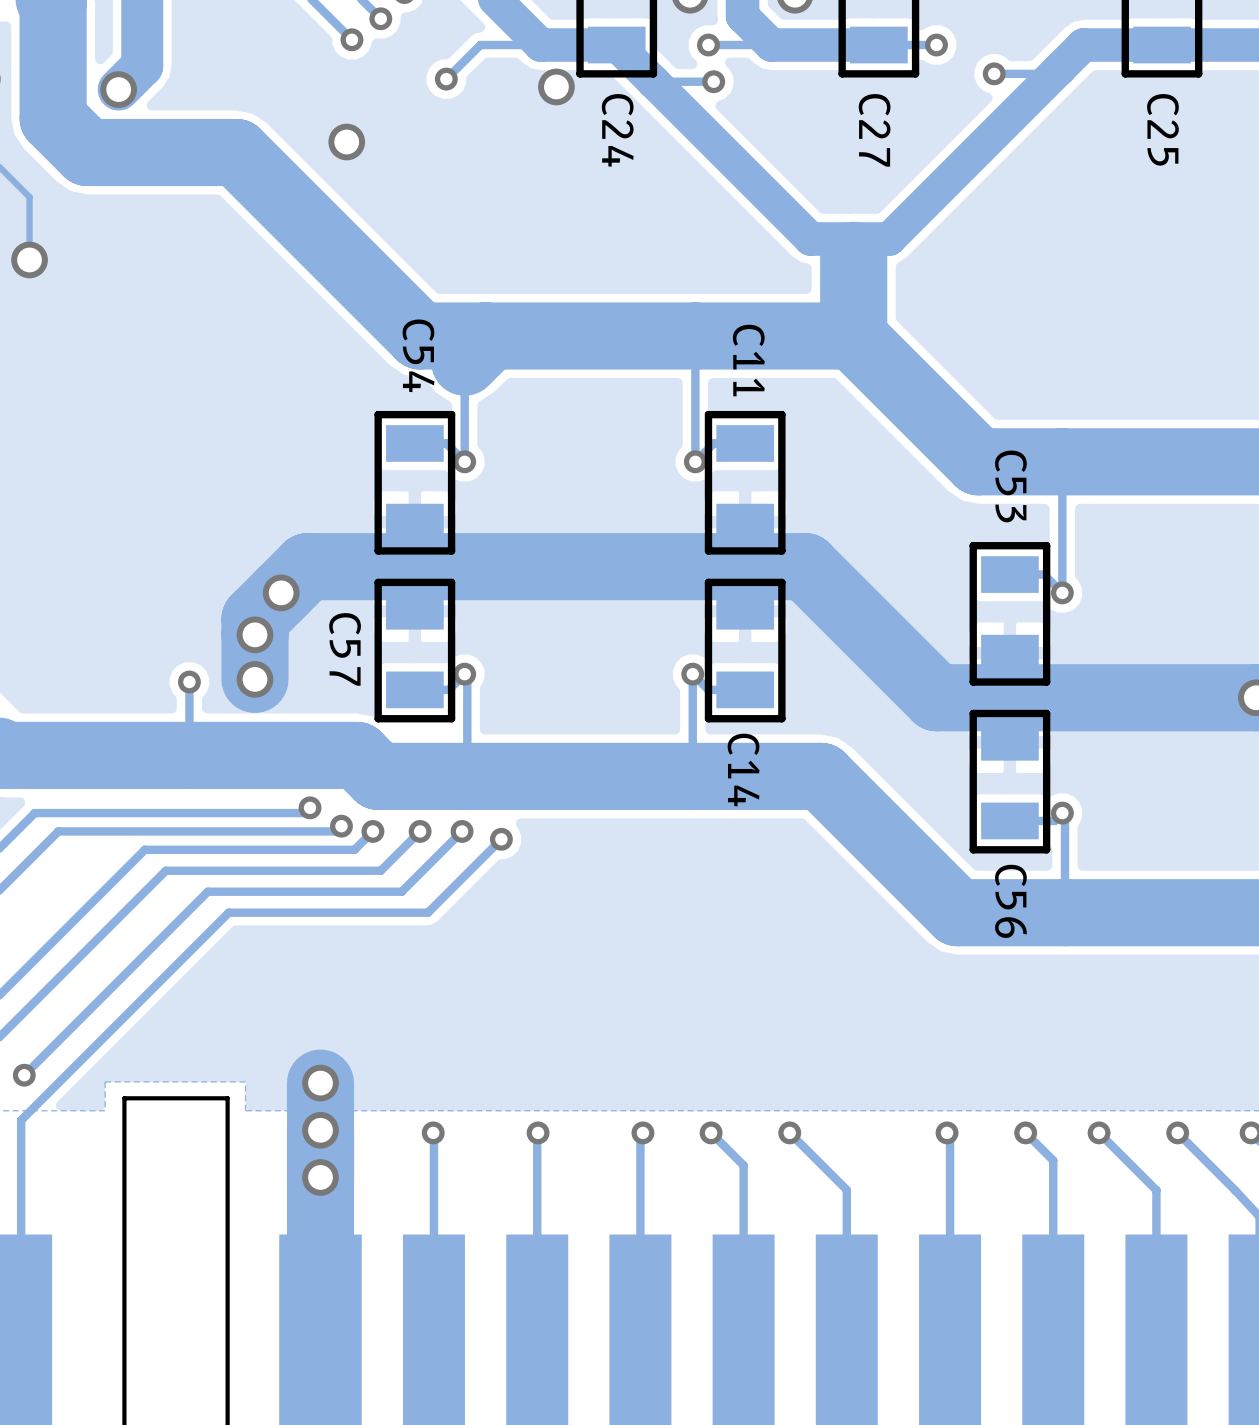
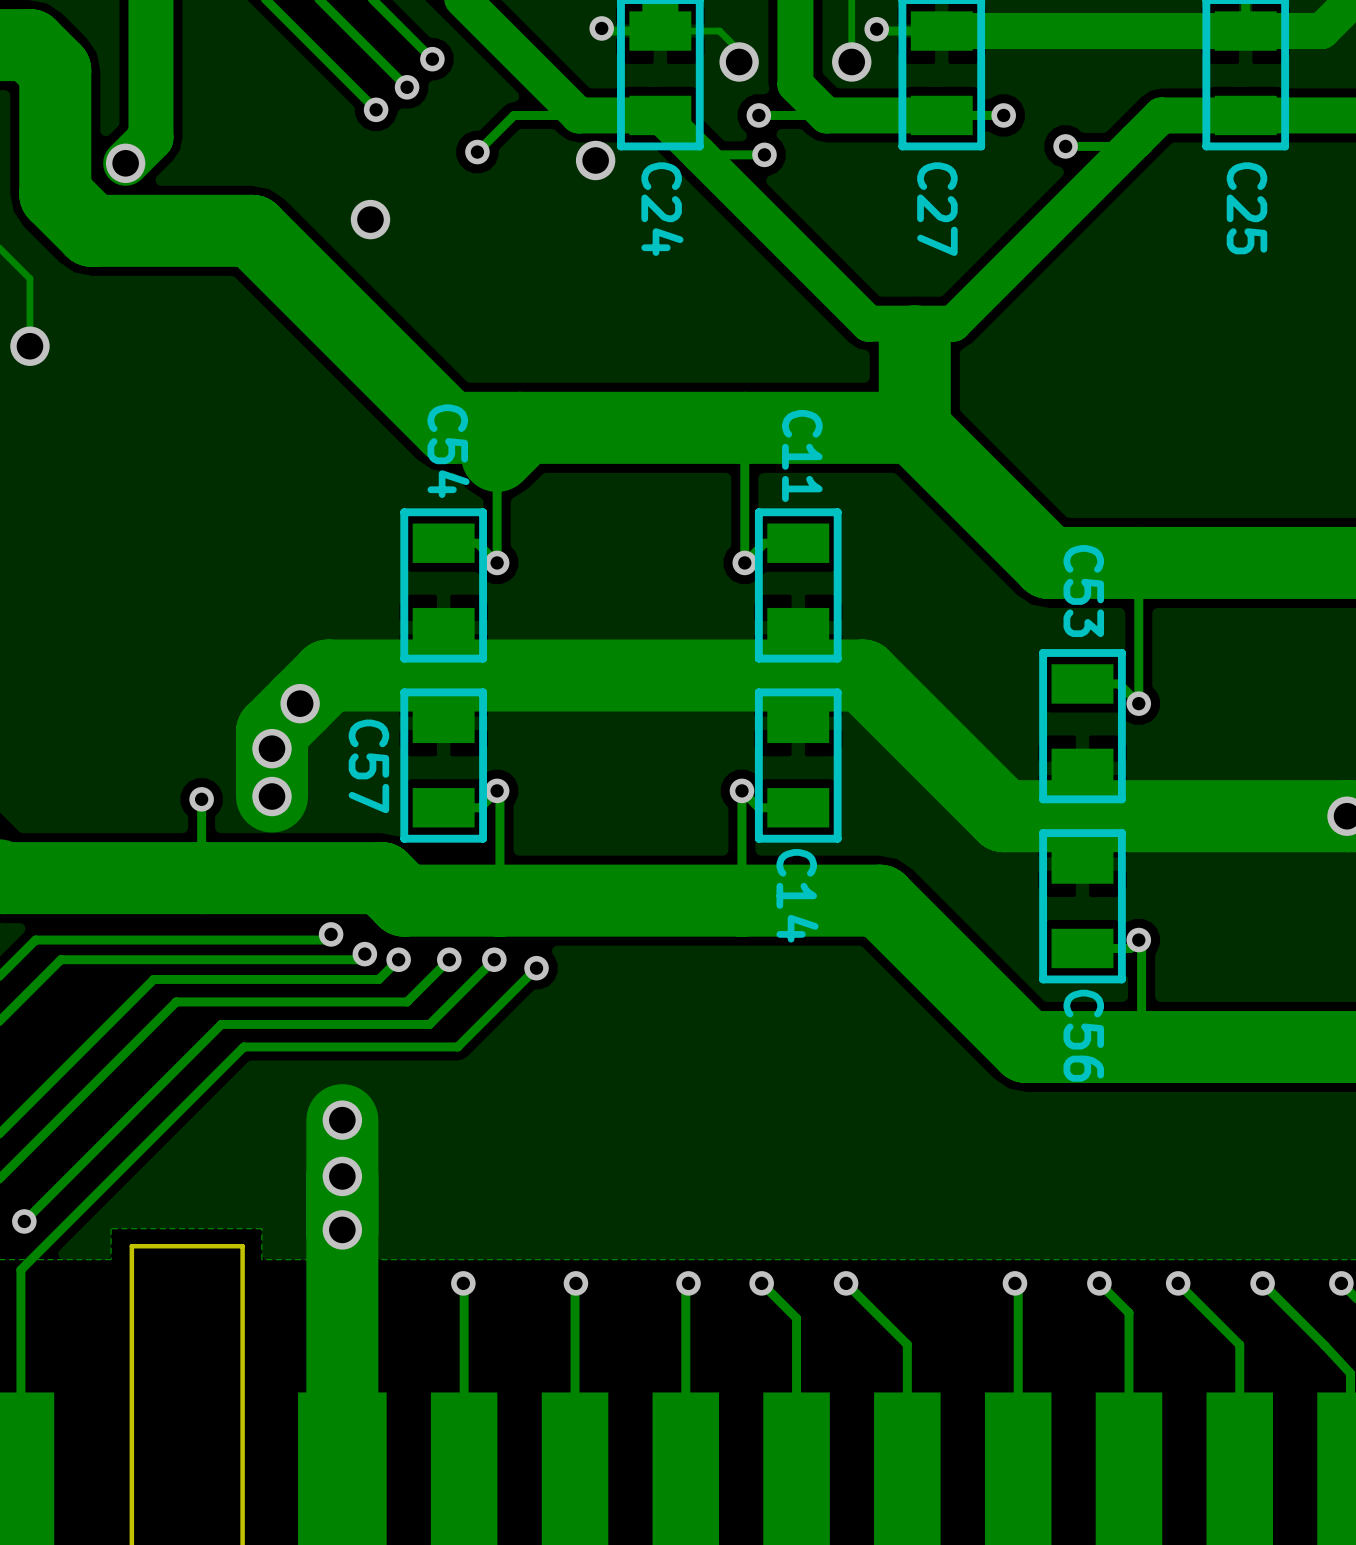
track: none -> (342, 1120) (342, 1229)
via: none -> (342, 1120)
via: none -> (342, 1176)
via: (320, 1130) -> none
via: (320, 1177) -> none

